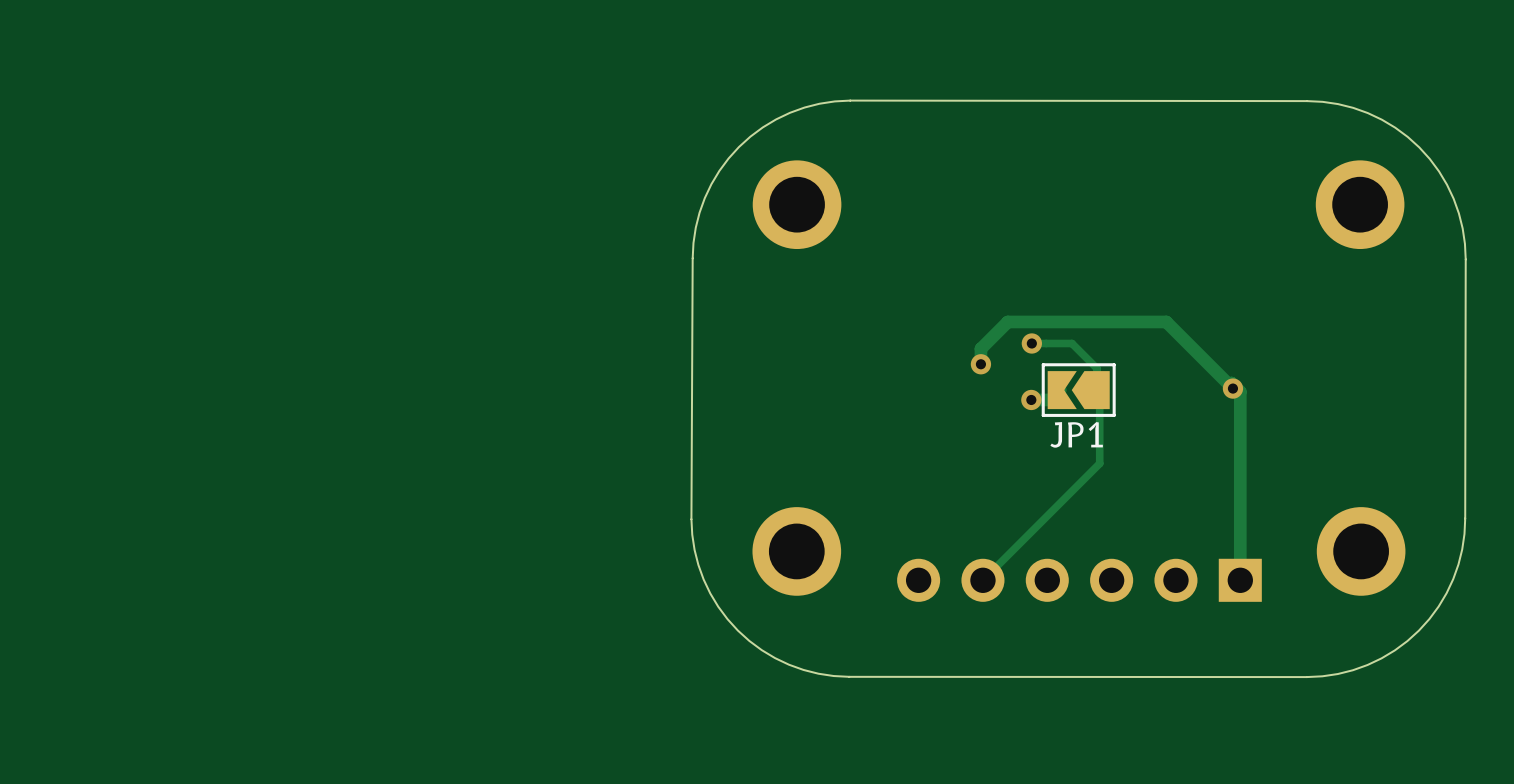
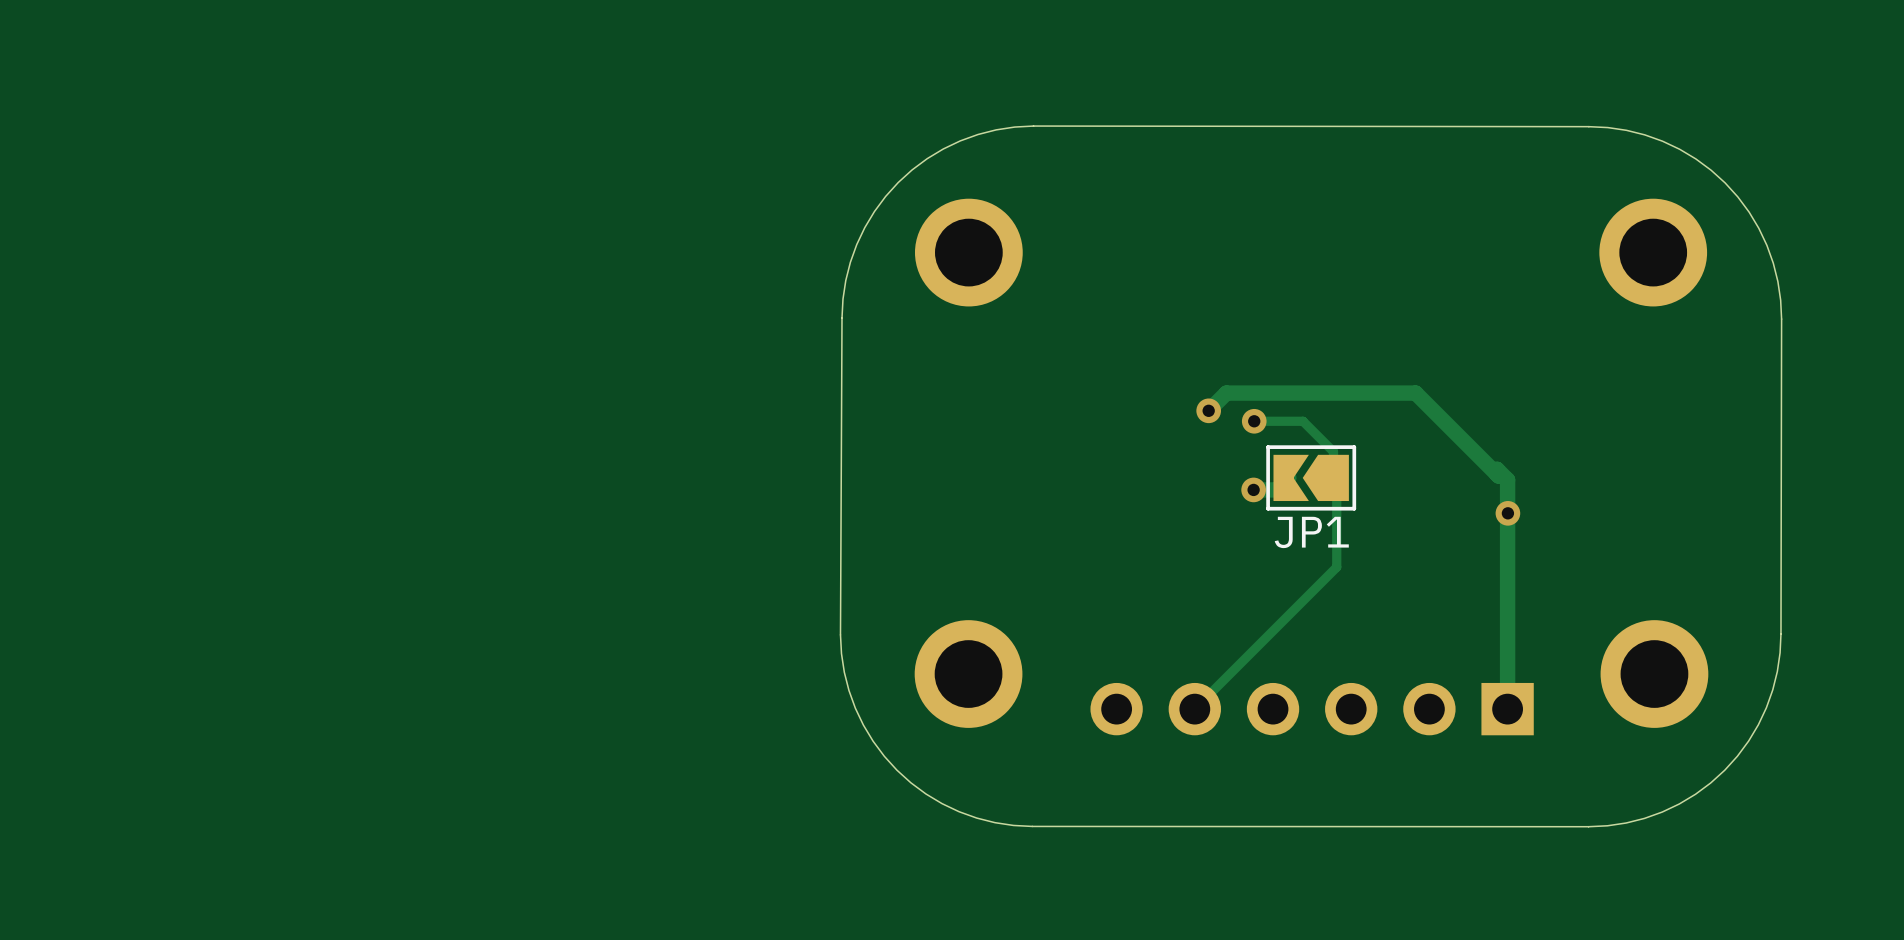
track: (1166, 321) (1007, 321) (980, 348) (980, 364) -> (1417, 395) (1415, 393) (1226, 393) (1208, 410)
via position: (980, 364) -> (1208, 410)
via position: (1232, 388) -> (1507, 513)

